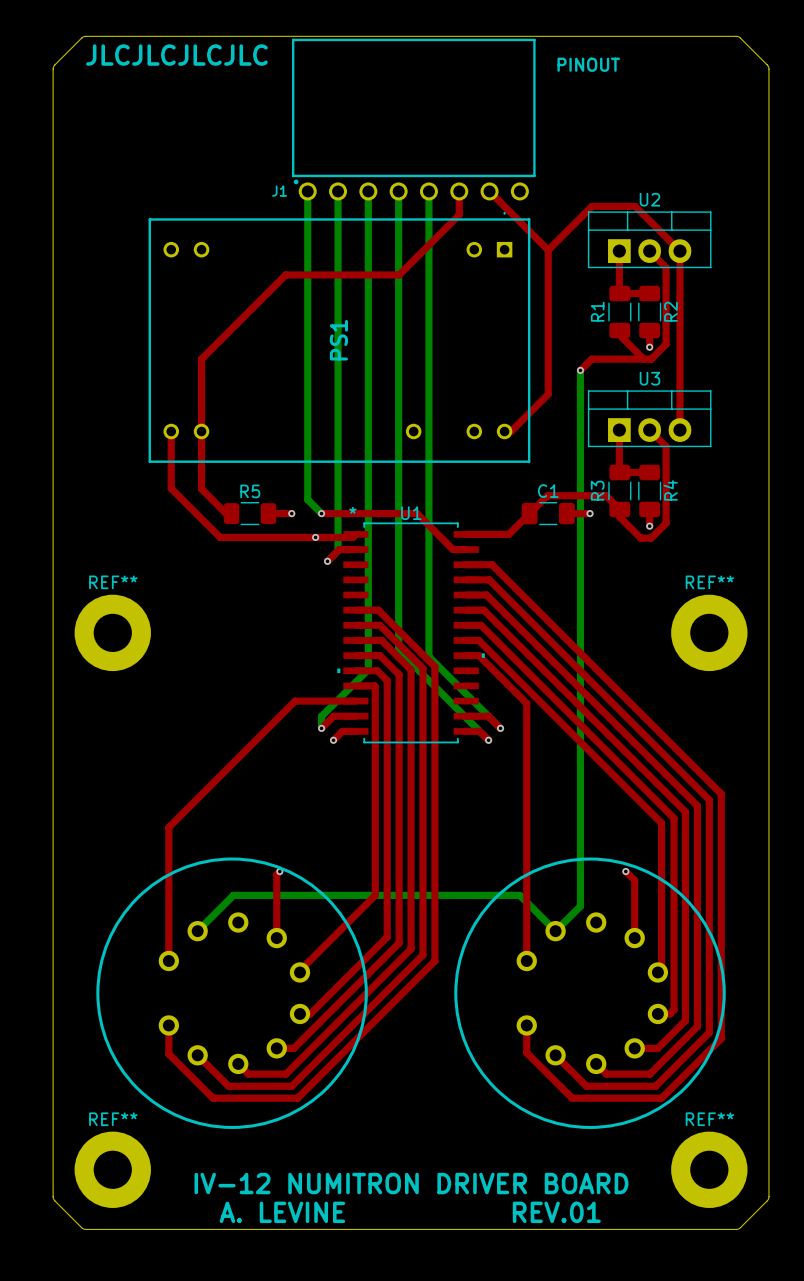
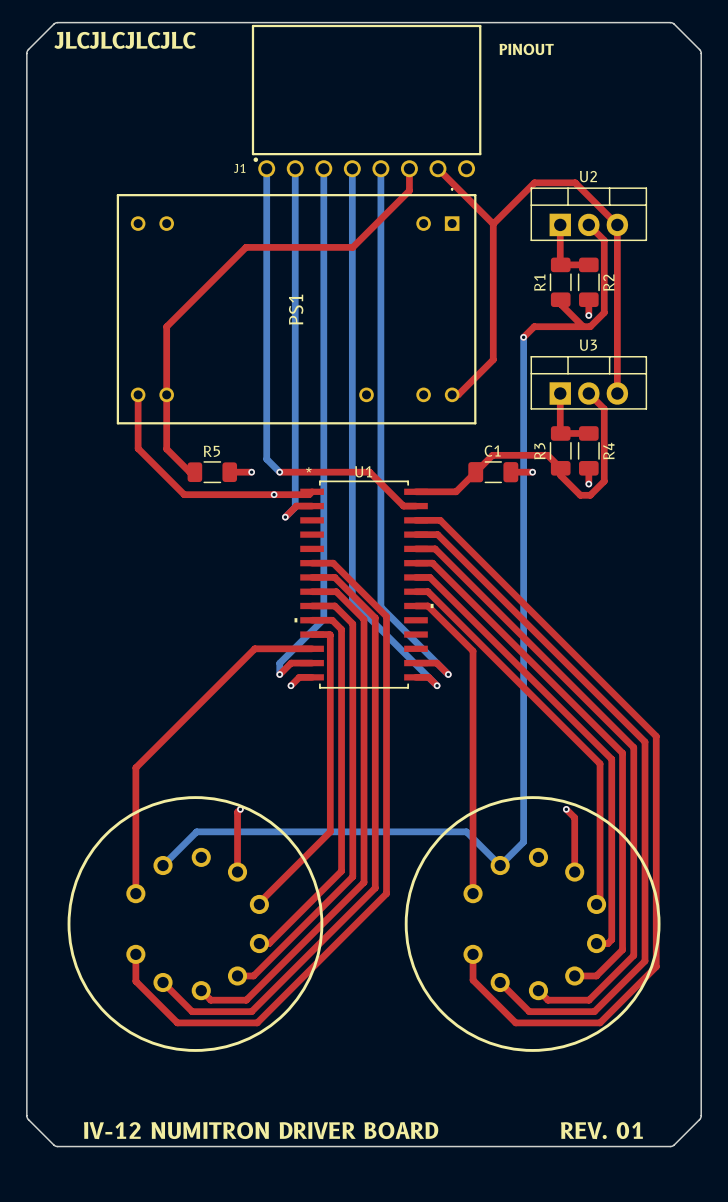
REF**: (112, 632) -> none
REF**: (709, 632) -> none
REF**: (112, 1169) -> none
REF**: (709, 1169) -> none
text: IV-12 NUMITRON DRIVER BOARD (411, 1183) -> none
text: none -> IV-12 NUMITRON DRIVER BOARD (261, 1130)
text: A. LEVINE REV.01 (410, 1212) -> none
text: none -> REV. 01 (601, 1130)

